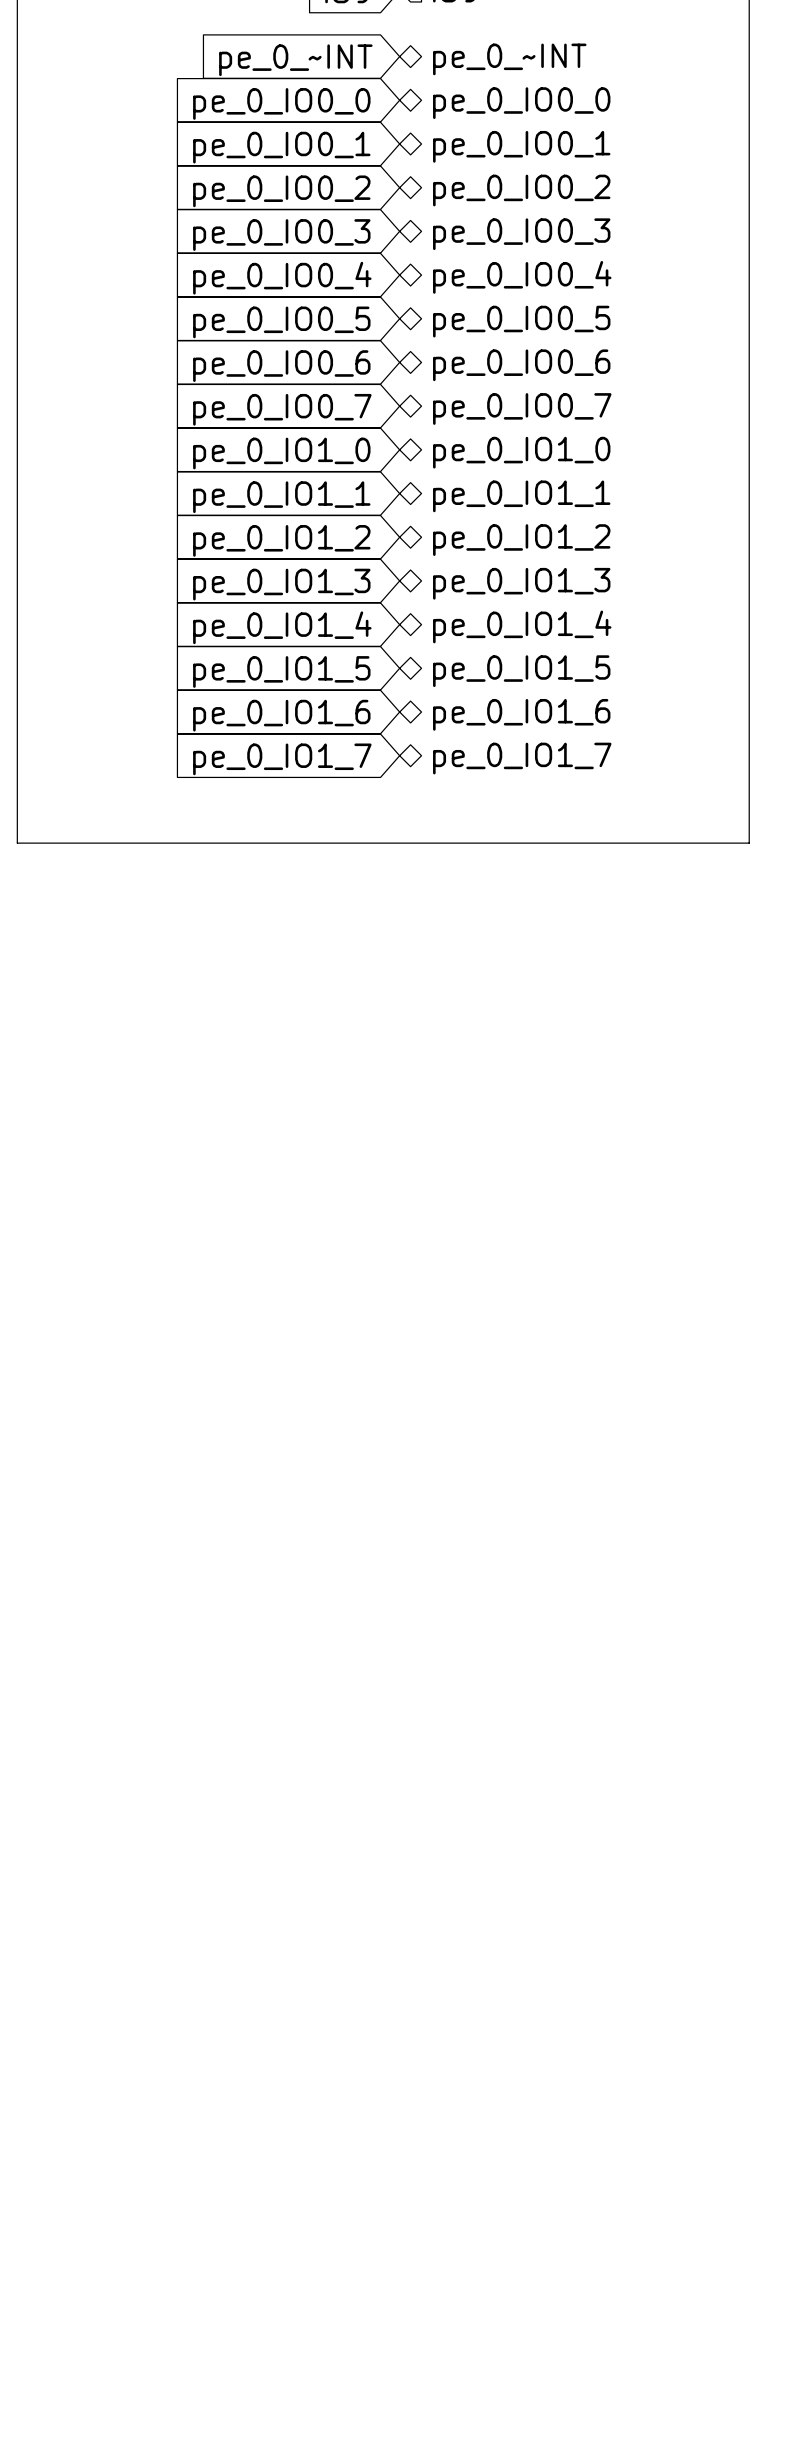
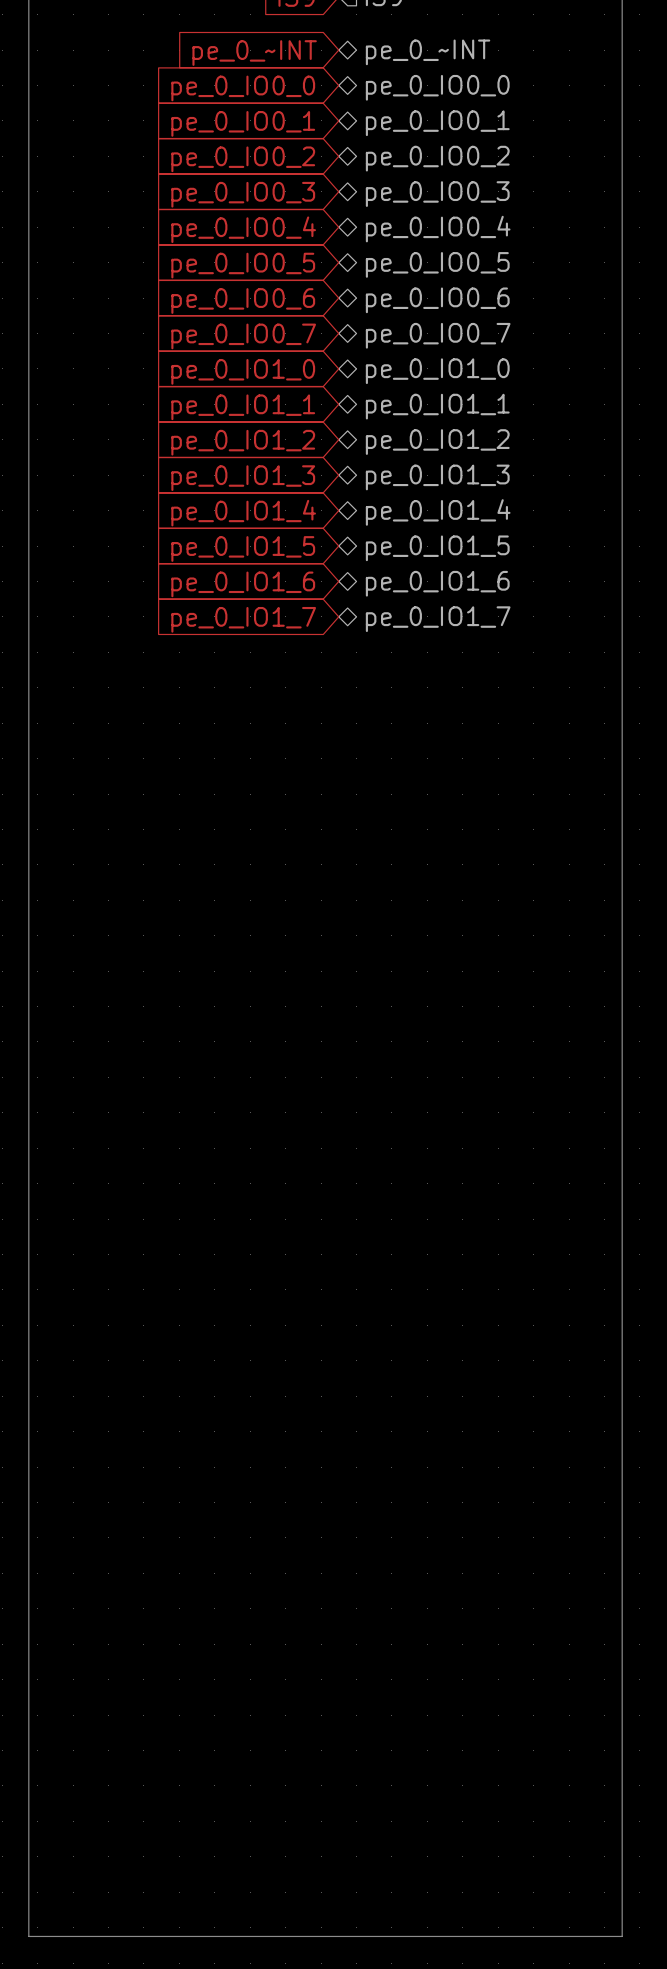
line: (17, 843) (749, 843) -> (28, 687) (28, 1936) (622, 1936) (622, 687)

